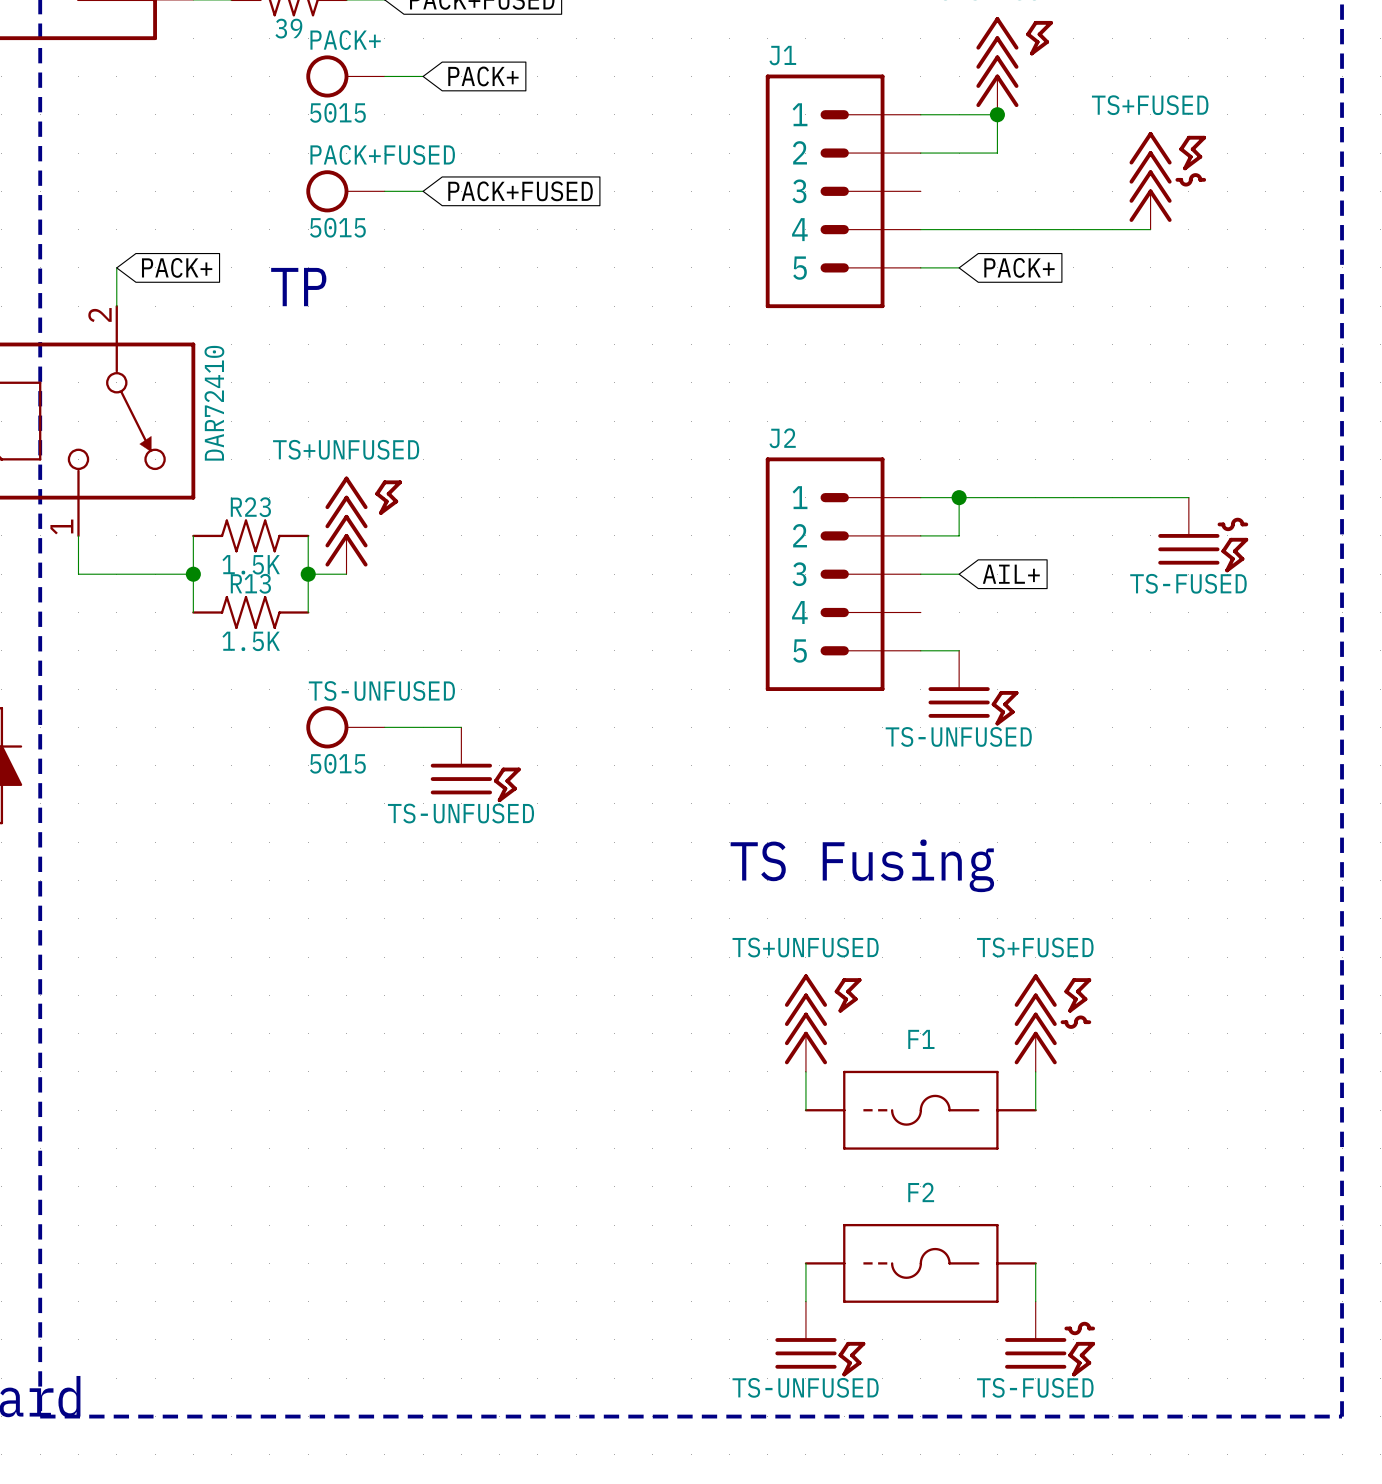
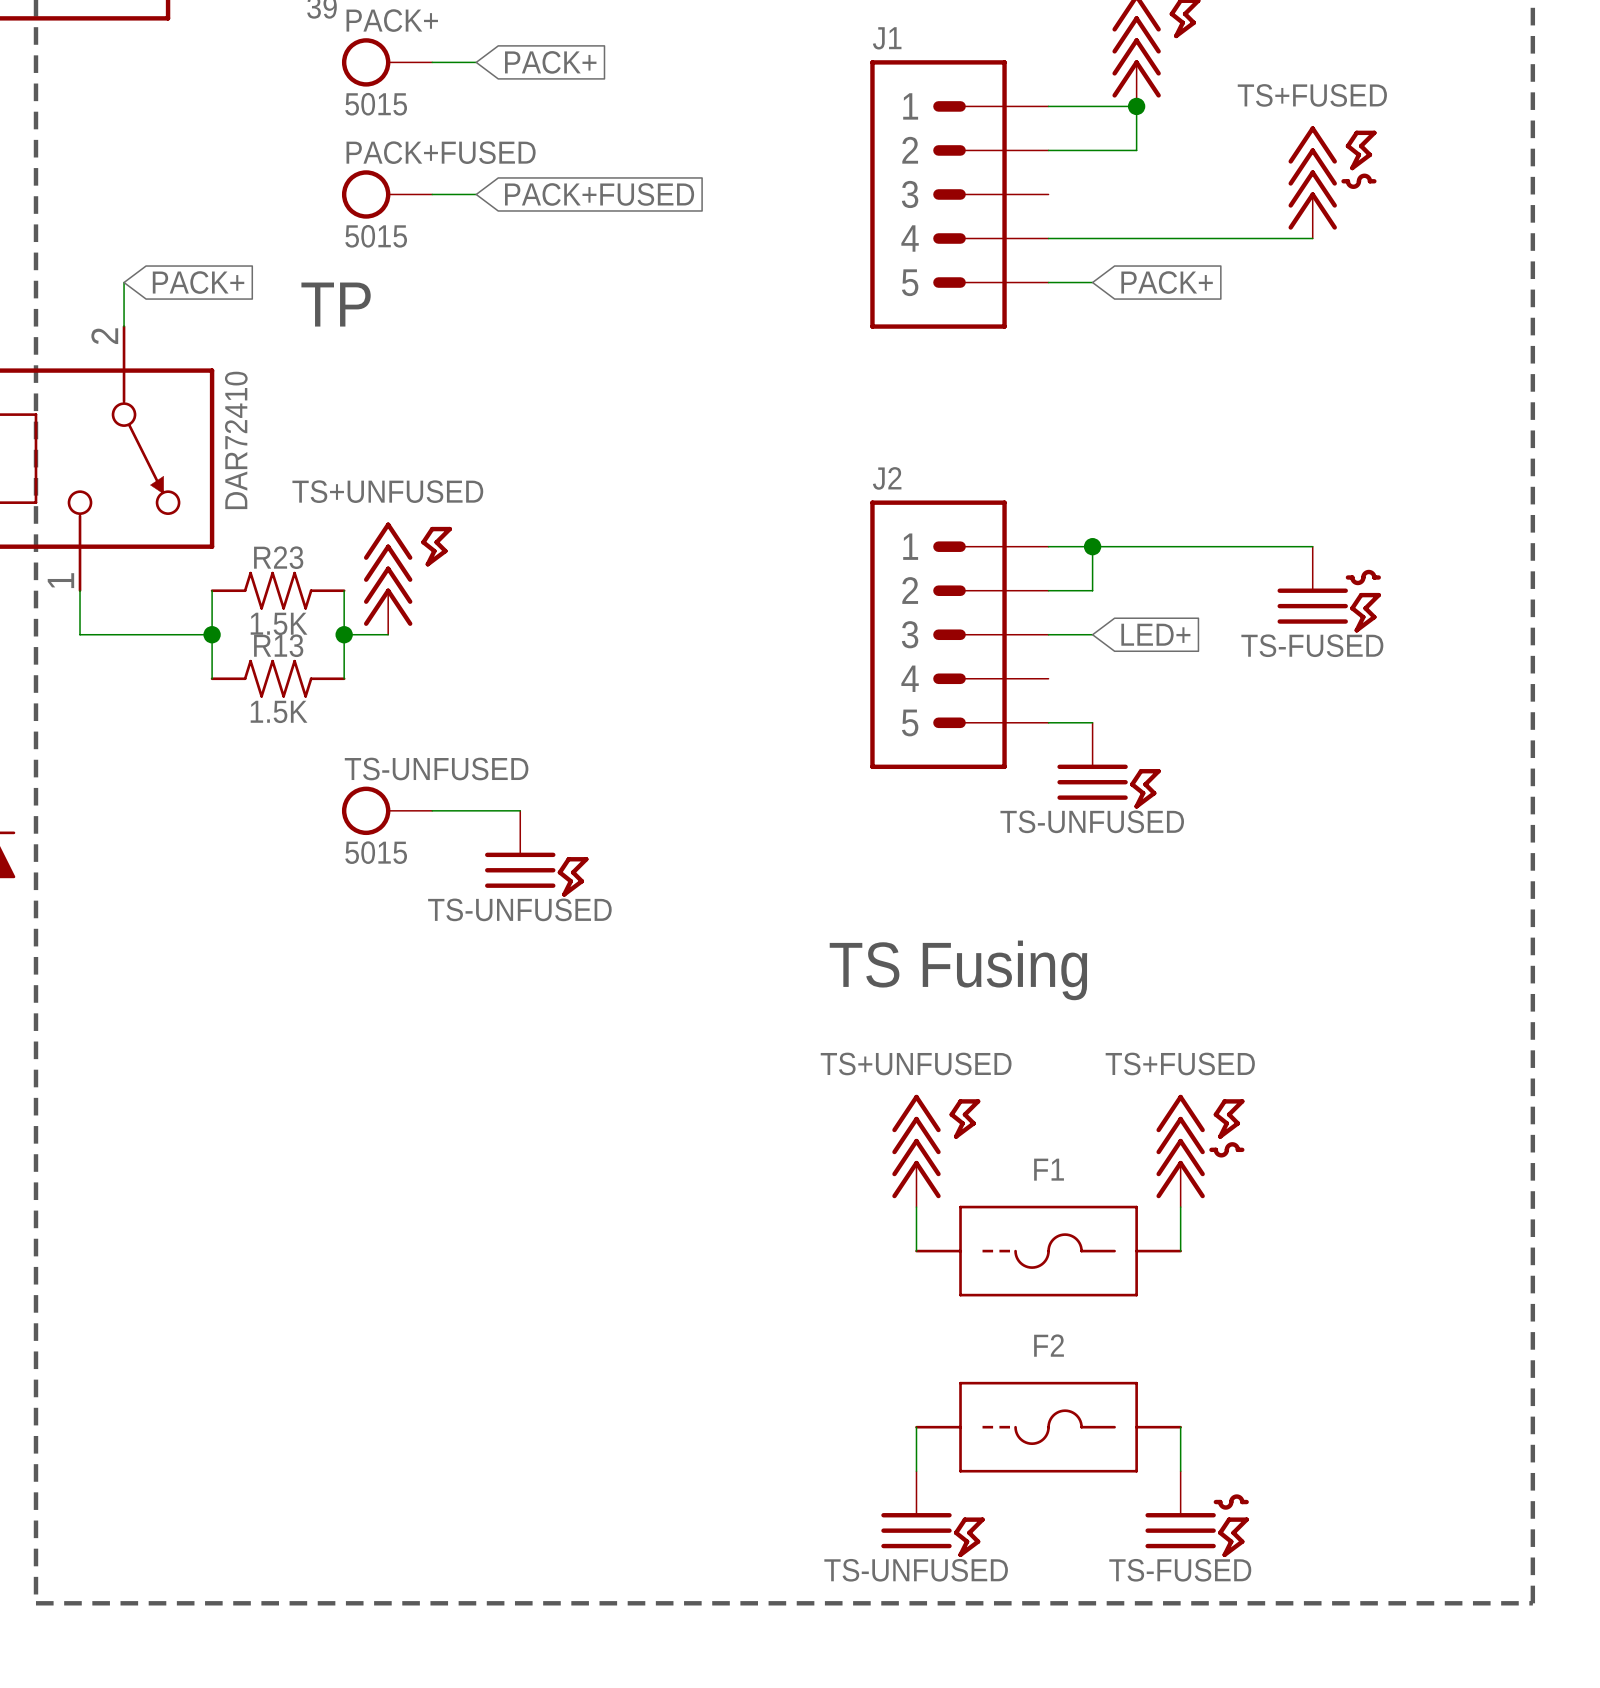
wire: (1150, 497) (1188, 497) -> none
power symbol position: TS-FUSED (1203, 534) -> TS-FUSED (1329, 589)
global label: AIL+ (1011, 574) -> LED+ (1155, 634)

